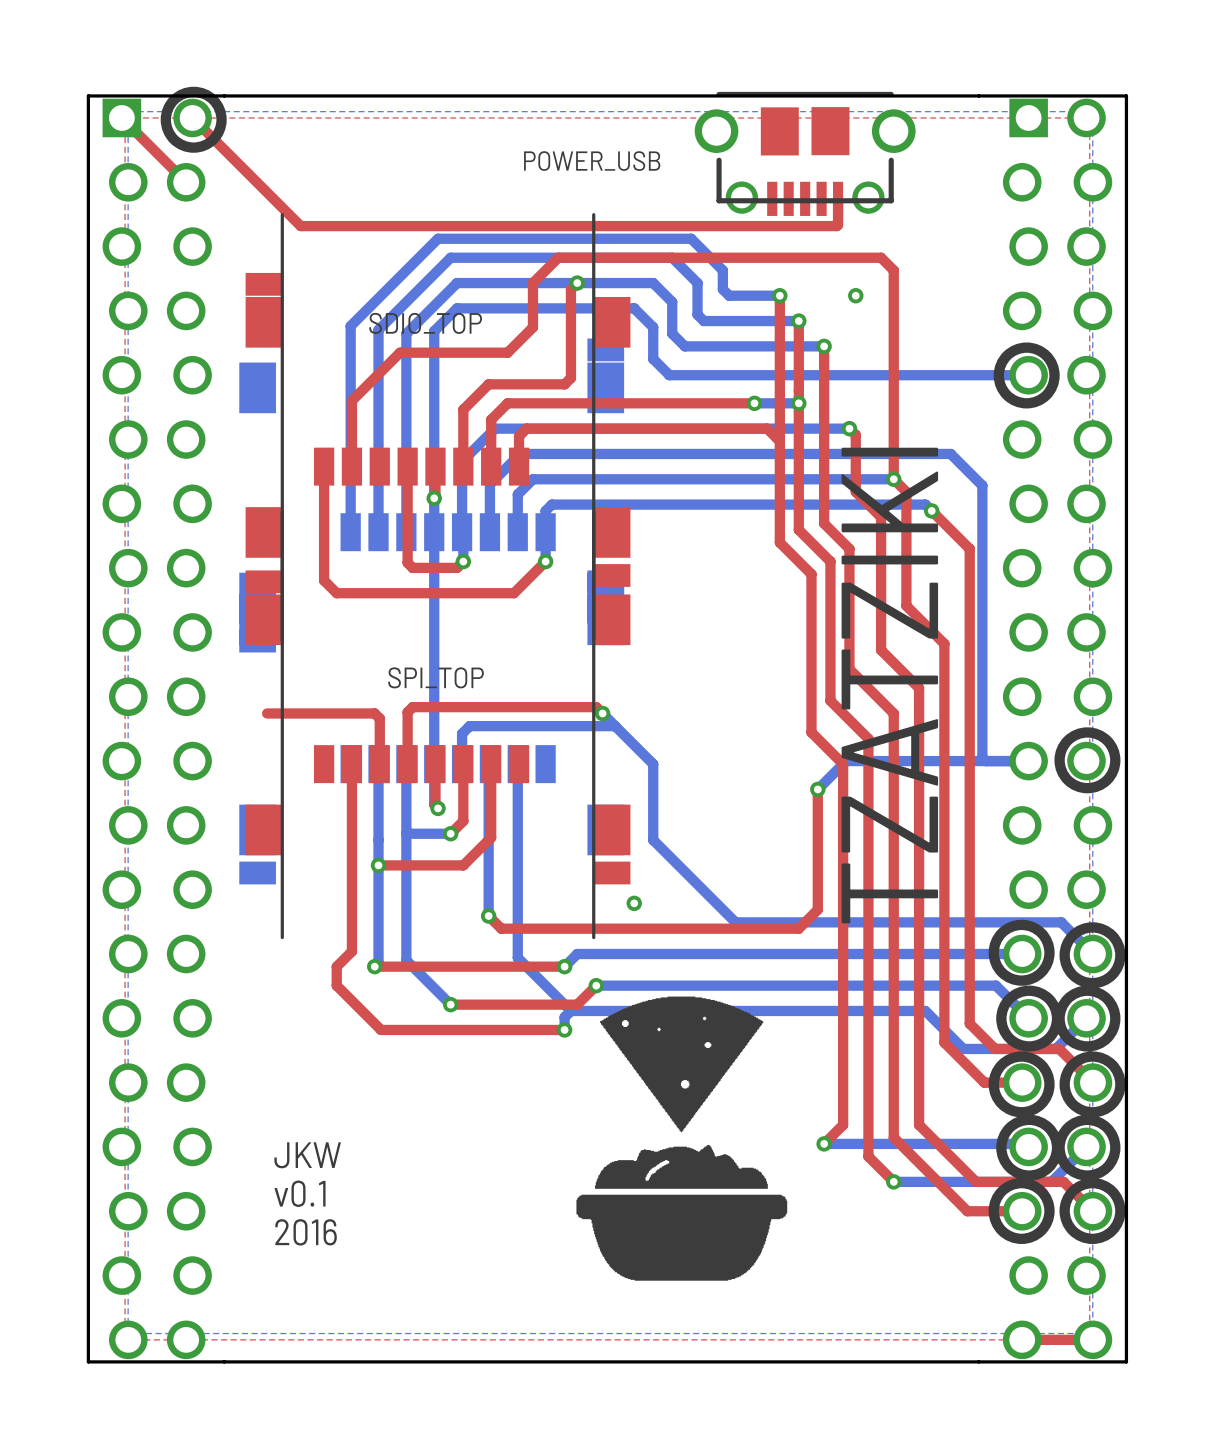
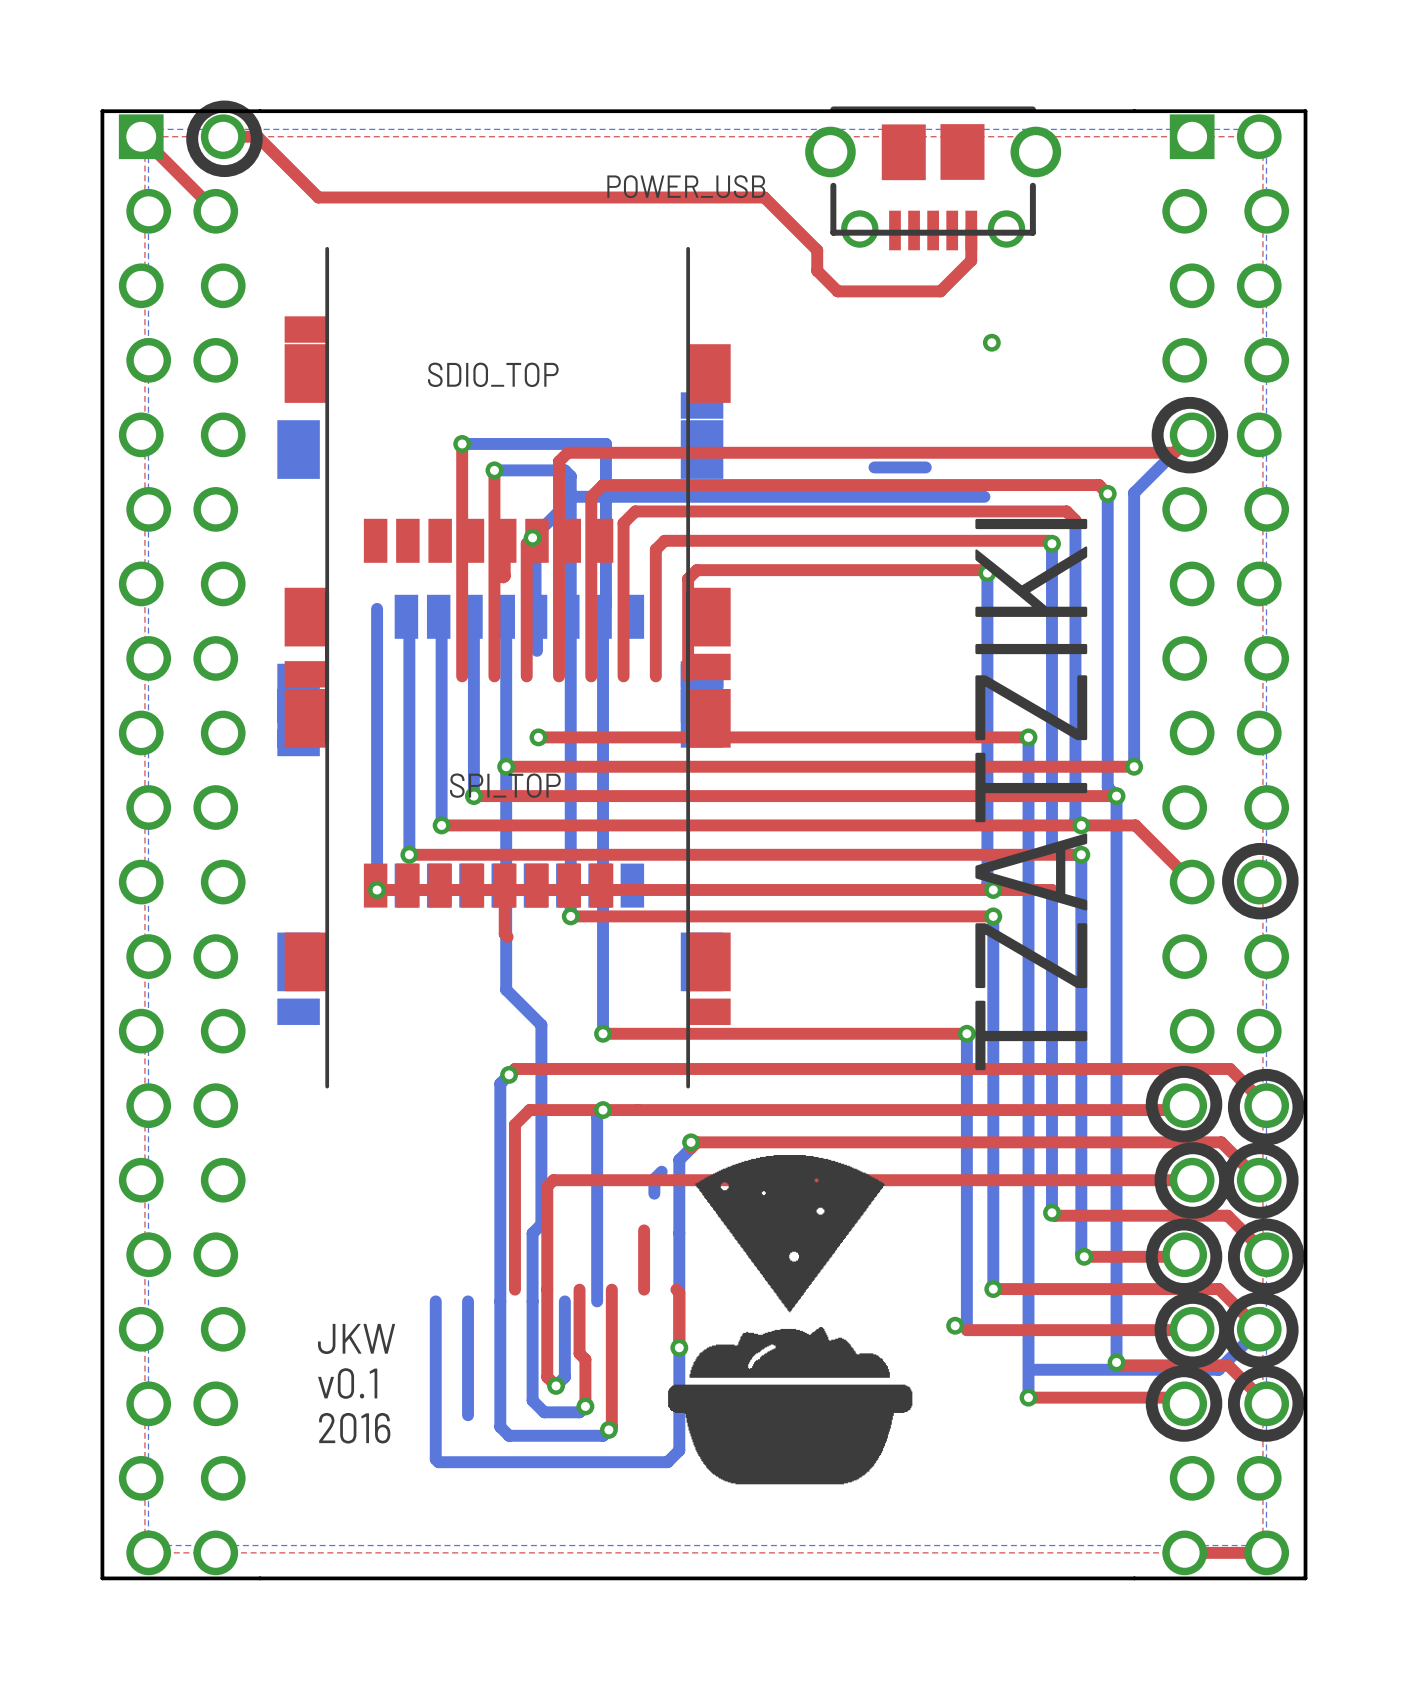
top track: (192, 117) (300, 226) (836, 226) -> (223, 136) (257, 136) (318, 197) (764, 197) (817, 250) (817, 270) (837, 291) (940, 291) (969, 262)
top track: (577, 283) (570, 289) (570, 378) (564, 384) (488, 384) (463, 409) (463, 466) -> none
via: (577, 283) -> none
top track: (779, 295) (779, 542) (811, 574) (811, 732) (843, 764) (843, 1124) (824, 1143) -> none
bottom track: (779, 295) (729, 295) (722, 289) (722, 270) (691, 238) (438, 238) (350, 326) (350, 532) -> none
via: (779, 295) -> none
top track: (798, 321) (798, 529) (830, 561) (830, 700) (868, 738) (868, 1156) (893, 1181) -> none
bottom track: (798, 321) (703, 321) (697, 314) (697, 283) (672, 257) (450, 257) (378, 329) (378, 532) -> none
via: (798, 321) -> none
top track: (824, 346) (824, 523) (849, 548) (849, 669) (893, 713) (893, 1137) (967, 1211) (1022, 1211) -> (1028, 1397) (1178, 1397) (1184, 1403)
bottom track: (824, 346) (684, 346) (672, 333) (672, 302) (653, 283) (457, 283) (406, 333) (406, 532) -> none
via: (824, 346) -> none
top track: none -> (1192, 434) (1174, 452) (567, 452) (559, 461) (559, 676)
bottom track: (1028, 375) (669, 375) (653, 359) (653, 327) (634, 308) (457, 308) (434, 331) (434, 804) (438, 808) -> (1192, 434) (1134, 492) (1134, 766)
top track: none -> (462, 443) (462, 676)
bottom track: none -> (462, 443) (605, 443) (605, 605) (603, 608) (603, 1033)
via: none -> (462, 443)
top track: (754, 403) (507, 403) (491, 419) (491, 466) -> none
via: (754, 403) -> none
via: (798, 403) -> none
top track: none -> (494, 470) (494, 676)
bottom track: none -> (494, 470) (564, 470) (570, 476) (570, 916)
via: none -> (494, 470)
top track: none -> (1107, 493) (1098, 485) (603, 485) (591, 496) (591, 676)
bottom track: none -> (1107, 493) (1107, 787) (1116, 796) (1116, 1362)
via: none -> (1107, 493)
top track: (849, 428) (855, 434) (855, 491) (881, 517) (881, 650) (919, 688) (919, 1124) (976, 1181) (1063, 1181) -> (1116, 1362) (1119, 1365) (1228, 1365) (1232, 1369)
via: (849, 428) -> none
top track: (779, 441) (767, 428) (526, 428) (519, 436) (519, 466) -> none
top track: none -> (1075, 520) (1066, 511) (635, 511) (623, 523) (623, 676)
bottom track: none -> (1075, 520) (1075, 819) (1081, 825)
top track: none -> (532, 537) (526, 543) (526, 676)
top track: (324, 466) (324, 580) (336, 593) (513, 593) (545, 561) -> none
top track: (351, 466) (351, 400) (400, 352) (507, 352) (532, 327) (532, 283) (558, 257) (881, 257) (893, 270) (893, 479) (906, 491) (906, 605) (944, 643) (944, 1042) (984, 1082) (1022, 1082) -> (1084, 1256) (1182, 1256) (1184, 1254)
top track: (407, 466) (407, 562) (412, 567) (457, 567) (463, 561) -> none
top track: none -> (1051, 543) (1049, 540) (664, 540) (655, 549) (655, 676)
bottom track: none -> (1051, 543) (1051, 845) (1060, 854) (1081, 854) (1081, 1253) (1084, 1256)
bottom track: (893, 479) (532, 479) (517, 494) (517, 532) -> none
via position: (893, 479) -> (1051, 543)
top track: none -> (987, 573) (984, 570) (696, 570) (688, 578) (688, 676)
bottom track: none -> (987, 573) (987, 884) (993, 889)
via: none -> (987, 573)
via position: (434, 498) -> (532, 537)
top track: (931, 510) (969, 548) (969, 1023) (995, 1048) -> (1051, 1212) (1054, 1215) (1153, 1215)
bottom track: (931, 510) (925, 504) (551, 504) (545, 510) (545, 561) -> none
via: (931, 510) -> none
bottom track: none -> (377, 608) (377, 889)
bottom track: none -> (409, 608) (409, 854)
bottom track: none -> (441, 608) (441, 825)
bottom track: none -> (473, 608) (473, 796)
bottom track: none -> (506, 608) (506, 989) (541, 1024) (541, 1224) (532, 1233) (532, 1400) (544, 1412) (579, 1412) (585, 1406)
bottom track: (489, 532) (489, 484) (520, 453) (950, 453) (982, 485) (982, 757) (985, 761) -> none
via: (463, 561) -> none
via: (545, 561) -> none
top track: none -> (538, 737) (1028, 737)
via: none -> (538, 737)
bottom track: none -> (1028, 737) (1028, 1397)
via: none -> (1028, 737)
top track: none -> (506, 766) (1134, 766)
via: none -> (506, 766)
via: none -> (1134, 766)
top track: none -> (473, 796) (1116, 796)
via: none -> (473, 796)
via: none -> (1116, 796)
top track: none -> (441, 825) (1135, 825) (1192, 882)
via: none -> (441, 825)
via: none -> (1081, 825)
top track: (267, 713) (374, 713) (379, 718) (379, 764) -> none
top track: (602, 713) (596, 707) (412, 707) (407, 712) (407, 764) -> none
bottom track: (602, 713) (653, 764) (653, 840) (735, 922) (1061, 922) (1092, 954) -> none
via: (602, 713) -> none
bottom track: (615, 726) (469, 726) (462, 733) (462, 764) -> none
top track: none -> (409, 854) (1081, 854)
via: none -> (409, 854)
via: none -> (1081, 854)
bottom track: (1028, 761) (846, 761) (817, 789) -> none
top track: (351, 764) (351, 951) (336, 966) (336, 985) (381, 1029) (564, 1029) -> none
bottom track: (378, 764) (378, 962) (374, 966) -> none
bottom track: (406, 764) (406, 960) (450, 1004) -> none
top track: (463, 764) (463, 821) (450, 833) -> none
bottom track: (489, 764) (488, 916) -> none
top track: (491, 764) (491, 837) (463, 865) (378, 865) -> none
bottom track: (517, 764) (517, 957) (570, 1010) (925, 1010) (963, 1048) (1055, 1048) (1086, 1018) -> none
top track: none -> (377, 889) (1051, 889)
via: none -> (377, 889)
via: none -> (993, 889)
bottom track: none -> (1051, 889) (1051, 1212)
top track: (817, 789) (817, 909) (798, 928) (501, 928) (488, 916) -> none
via: (817, 789) -> none
top track: none -> (570, 916) (993, 916)
via: none -> (570, 916)
bottom track: none -> (993, 916) (993, 1289)
via: none -> (993, 916)
via: (438, 808) -> none
bottom track: (406, 833) (450, 833) -> none
via: (450, 833) -> none
via: (378, 865) -> none
top track: none -> (603, 1033) (966, 1033)
via: none -> (603, 1033)
bottom track: none -> (966, 1033) (966, 1330)
via: none -> (966, 1033)
via: (634, 903) -> none
via: (488, 916) -> none
top track: none -> (509, 1074) (514, 1068) (1230, 1068) (1266, 1105)
bottom track: none -> (509, 1074) (500, 1083) (500, 1426) (509, 1435) (603, 1435) (608, 1429)
via: none -> (509, 1074)
top track: none -> (1184, 1105) (1180, 1110) (529, 1110) (514, 1124) (514, 1289)
bottom track: (1022, 954) (577, 954) (564, 966) -> none
bottom track: none -> (603, 1110) (597, 1115) (597, 1301)
via: none -> (603, 1110)
top track: (374, 966) (564, 966) -> none
via: (374, 966) -> none
via: (564, 966) -> none
top track: (596, 985) (577, 1004) (450, 1004) -> none
bottom track: (596, 985) (995, 985) (1028, 1018) -> none
top track: none -> (691, 1148) (696, 1142) (1221, 1142) (1259, 1180)
bottom track: none -> (691, 1148) (679, 1159) (679, 1450) (667, 1462) (438, 1462) (435, 1459) (435, 1301)
via: (450, 1004) -> none
top track: none -> (1192, 1180) (553, 1180) (547, 1186) (547, 1377) (556, 1385)
via: (564, 1029) -> none
via: none -> (1051, 1212)
top track: none -> (644, 1230) (644, 1289)
via: none -> (1084, 1256)
top track: none -> (579, 1289) (579, 1353) (585, 1359) (585, 1406)
top track: none -> (611, 1289) (611, 1426) (608, 1429)
top track: none -> (676, 1289) (679, 1292) (679, 1347)
top track: none -> (993, 1289) (1219, 1289) (1259, 1329)
via: none -> (993, 1289)
bottom track: none -> (468, 1301) (468, 1415)
bottom track: none -> (564, 1301) (564, 1377) (556, 1385)
bottom track: (824, 1143) (1025, 1143) (1028, 1146) -> none
top track: none -> (1192, 1329) (966, 1330)
via: none -> (679, 1347)
via: none -> (1116, 1362)
via position: (893, 1181) -> (1028, 1397)
via: none -> (556, 1385)
via: none -> (585, 1406)
via: none -> (608, 1429)

